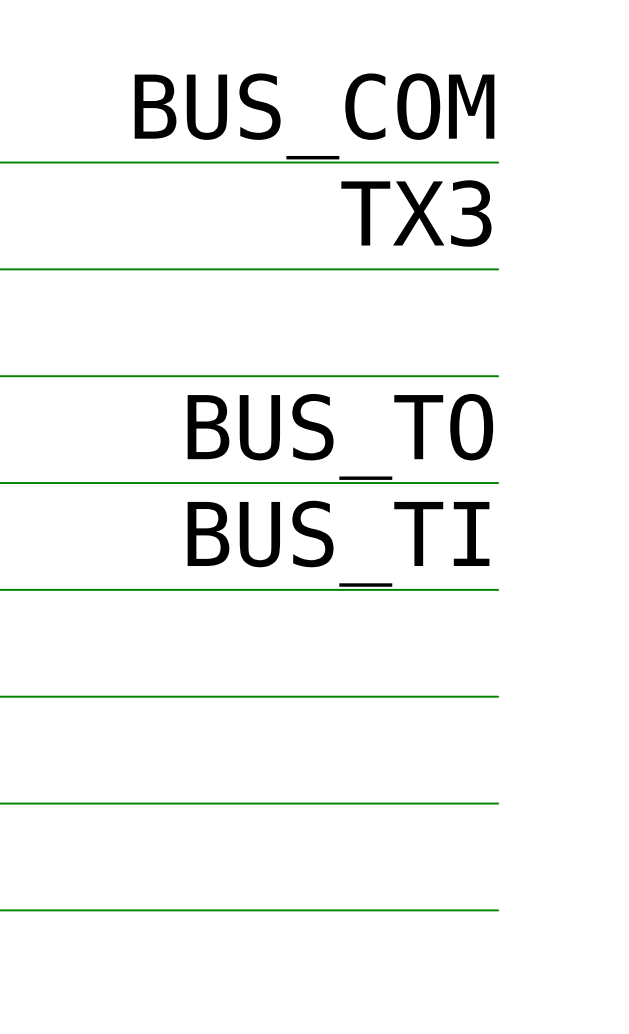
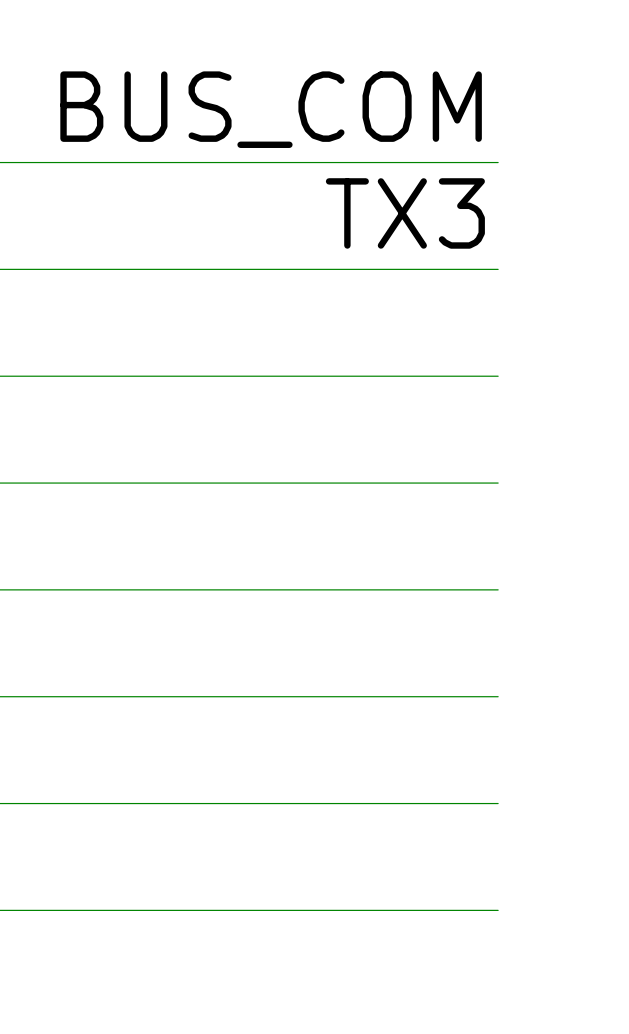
label: BUS_TO (340, 436) -> none
label: BUS_TI (338, 543) -> none

